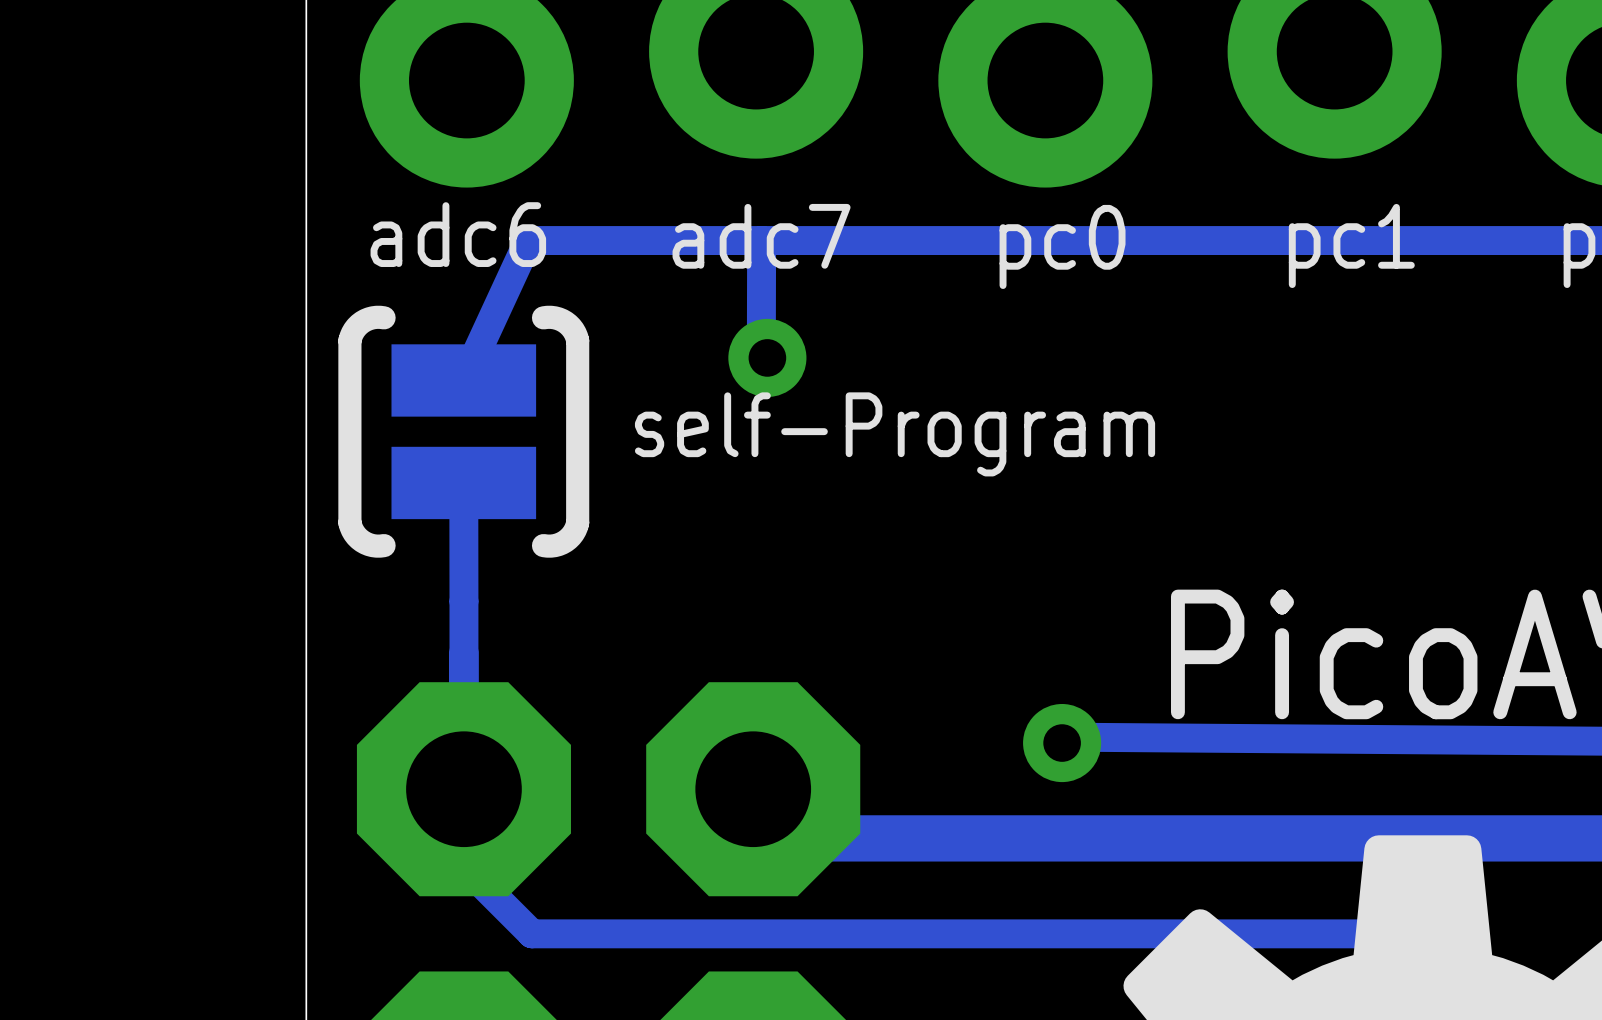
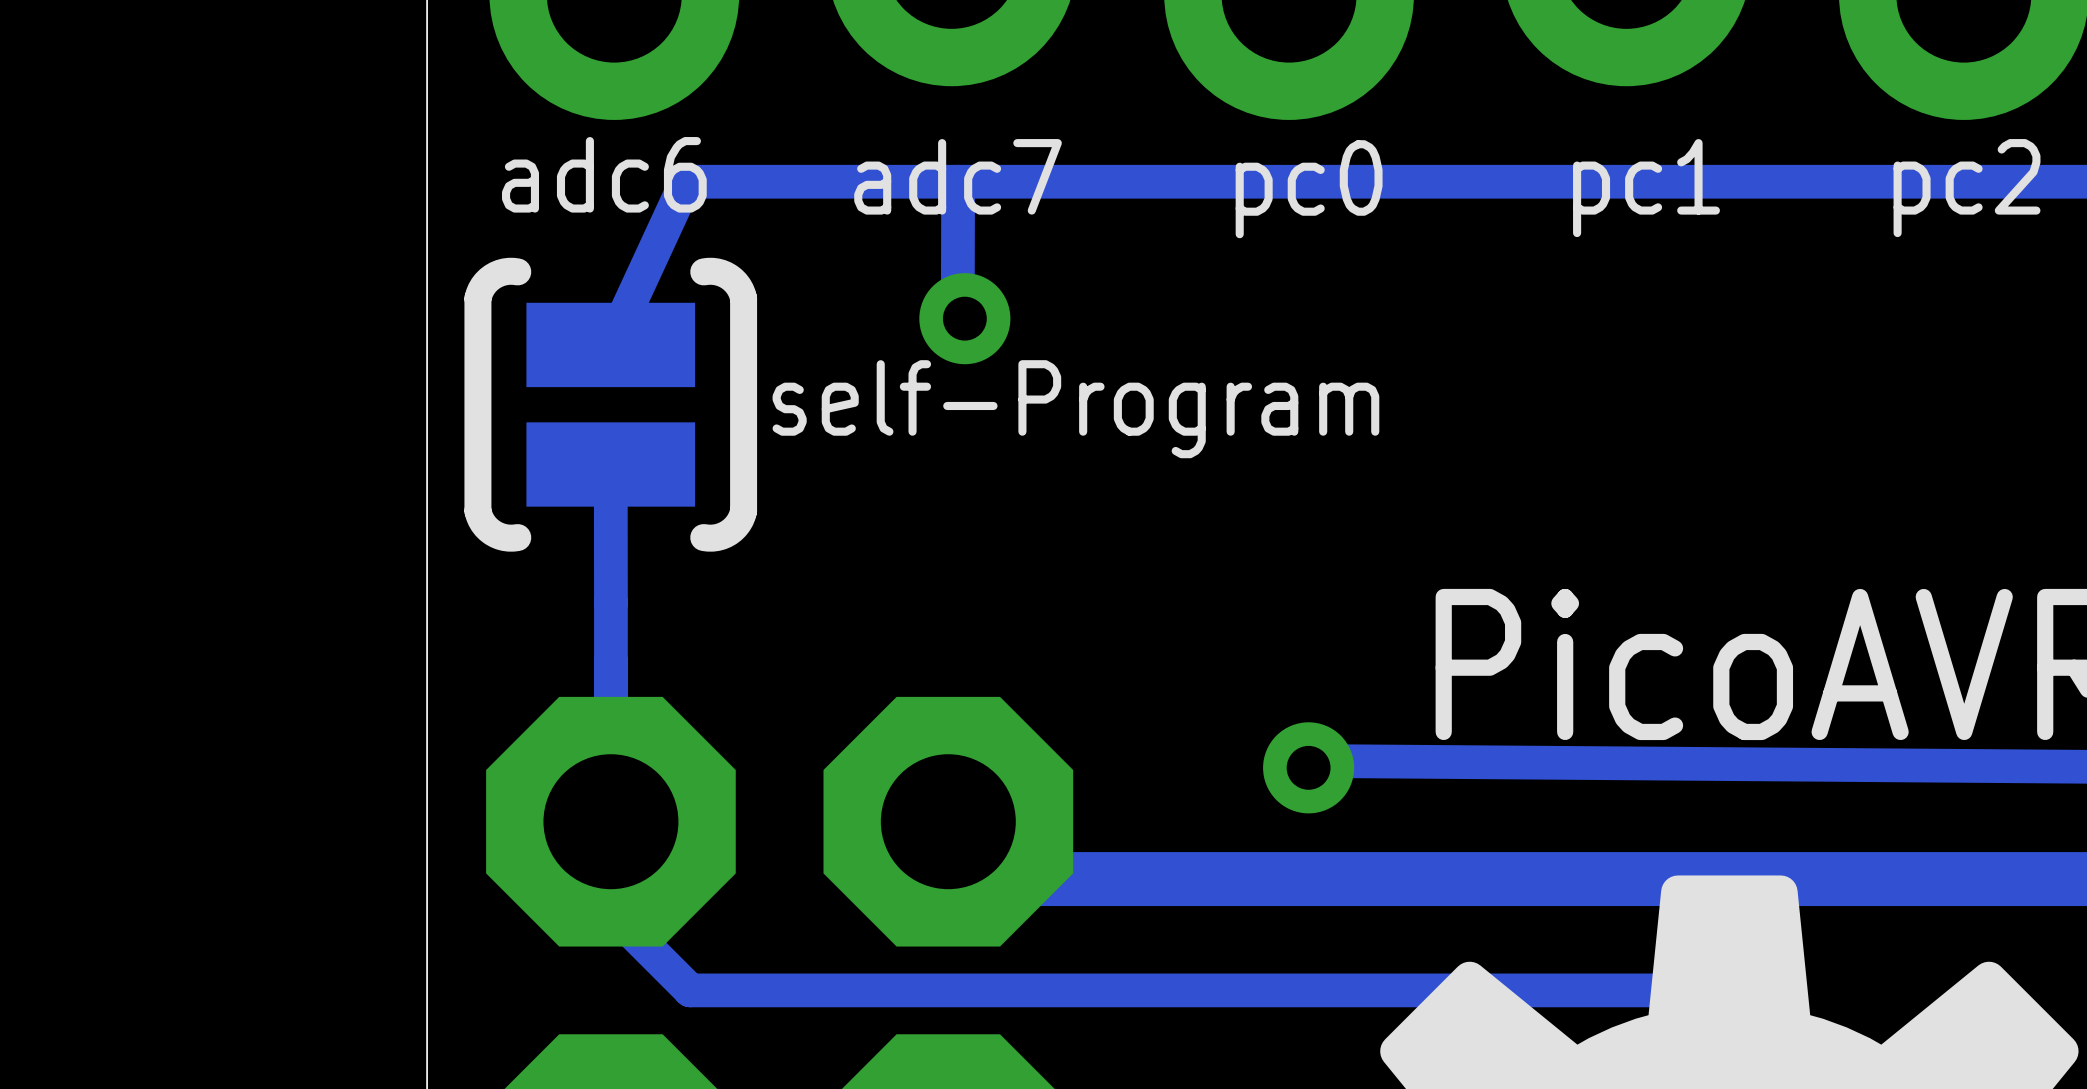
text position: self-Program (895, 434) -> self-Program (1075, 409)

